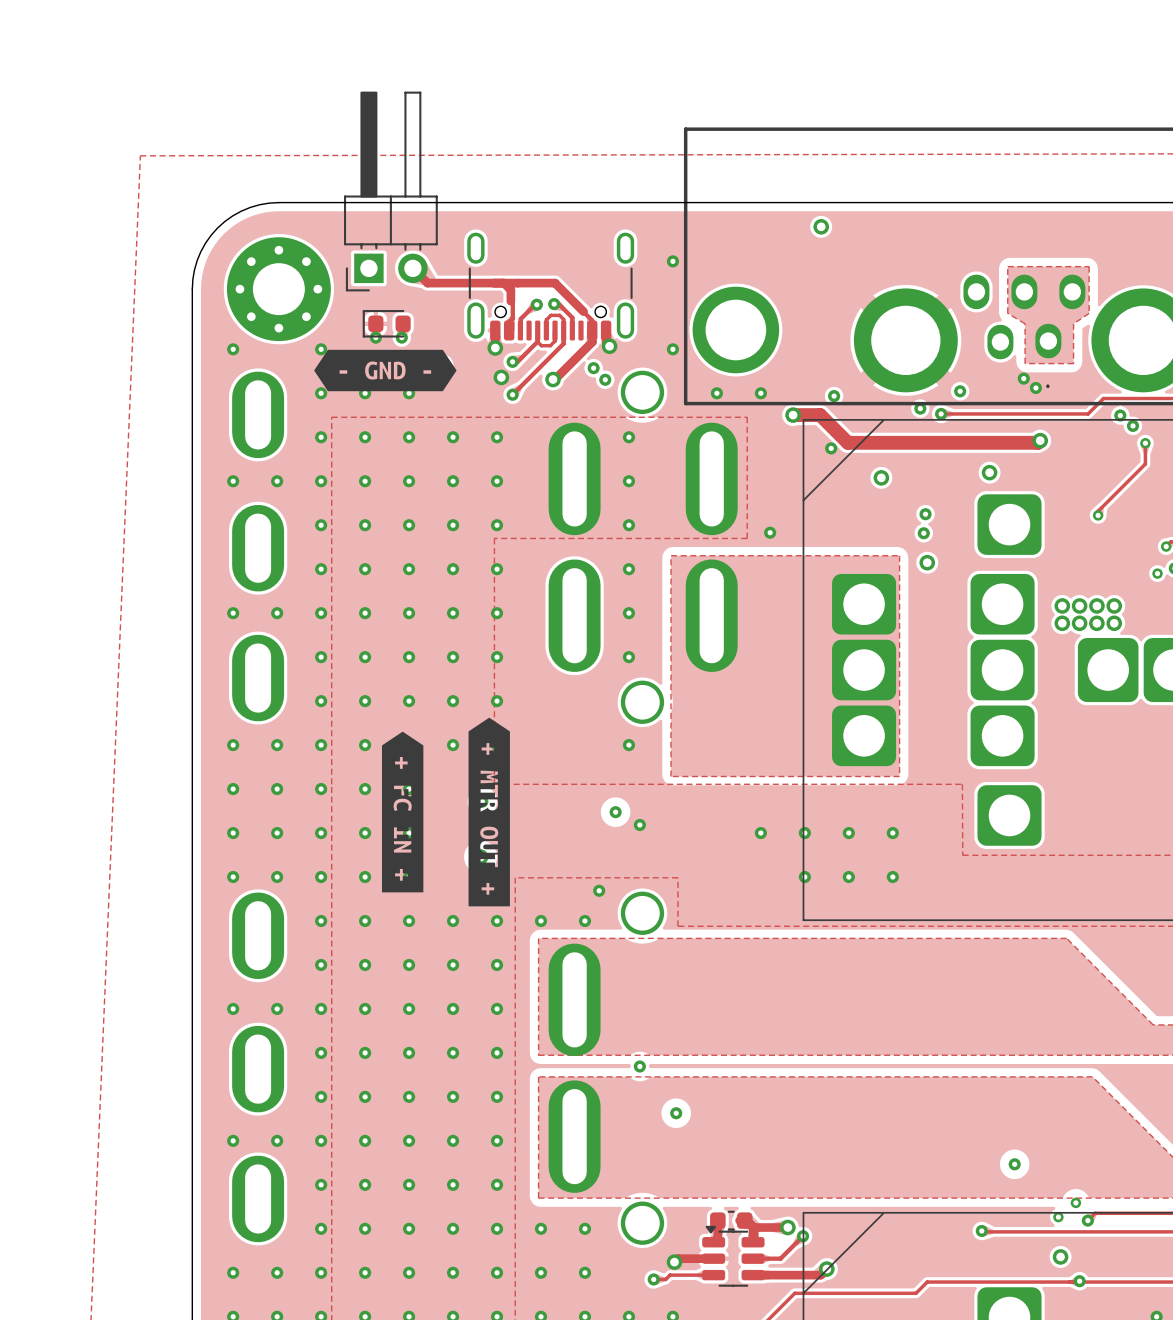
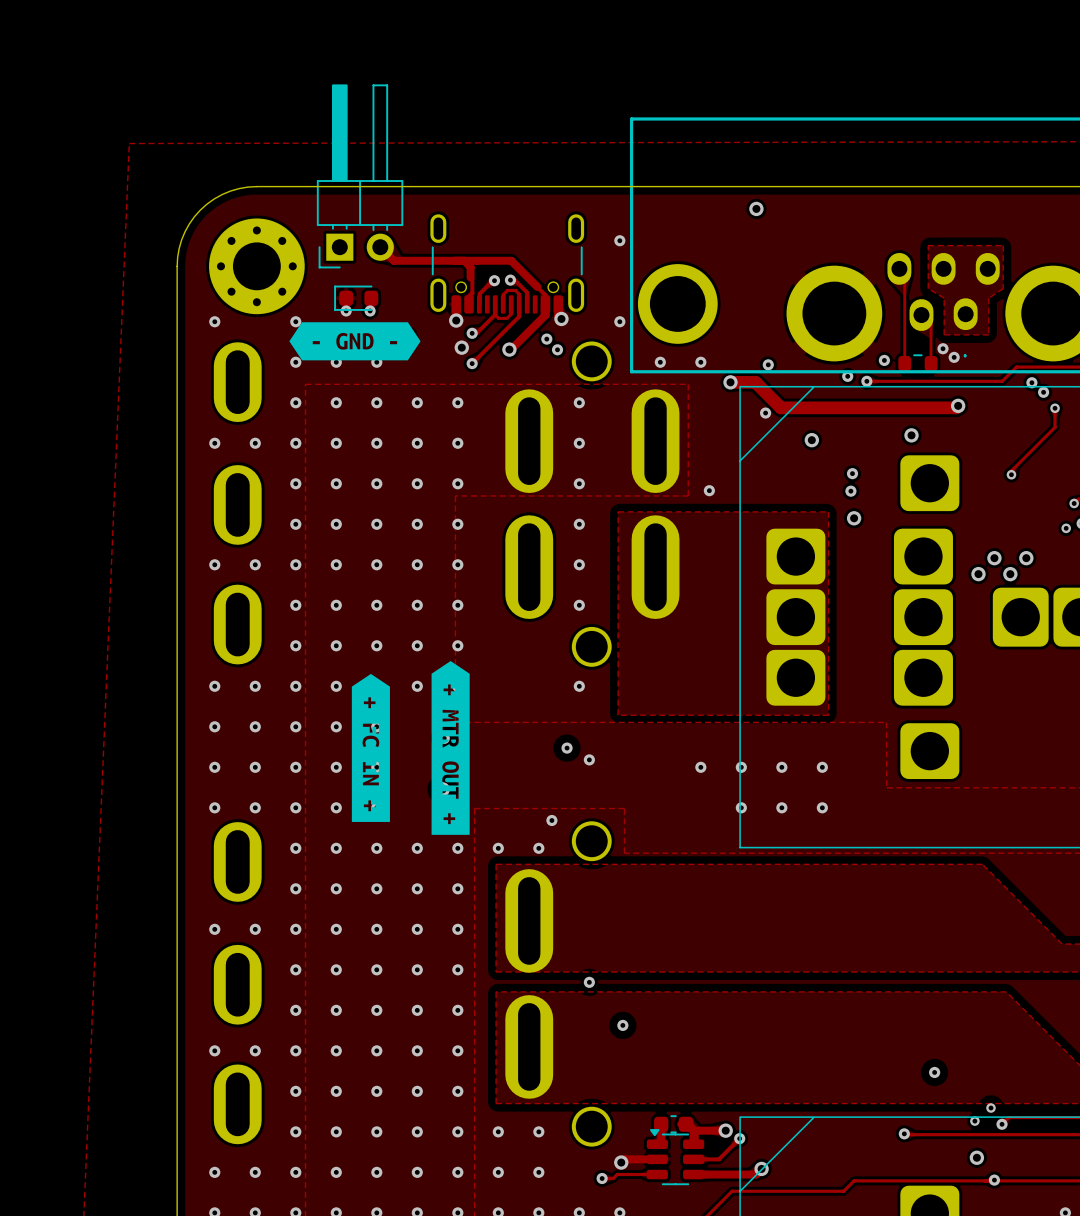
track: none -> (899, 268) (904, 274) (904, 363)
track: none -> (921, 315) (931, 324) (931, 363)
part: none -> (917, 363)
via: (1062, 605) -> none
via: (1096, 605) -> none
via: (1079, 623) -> none
via: (1114, 623) -> none

